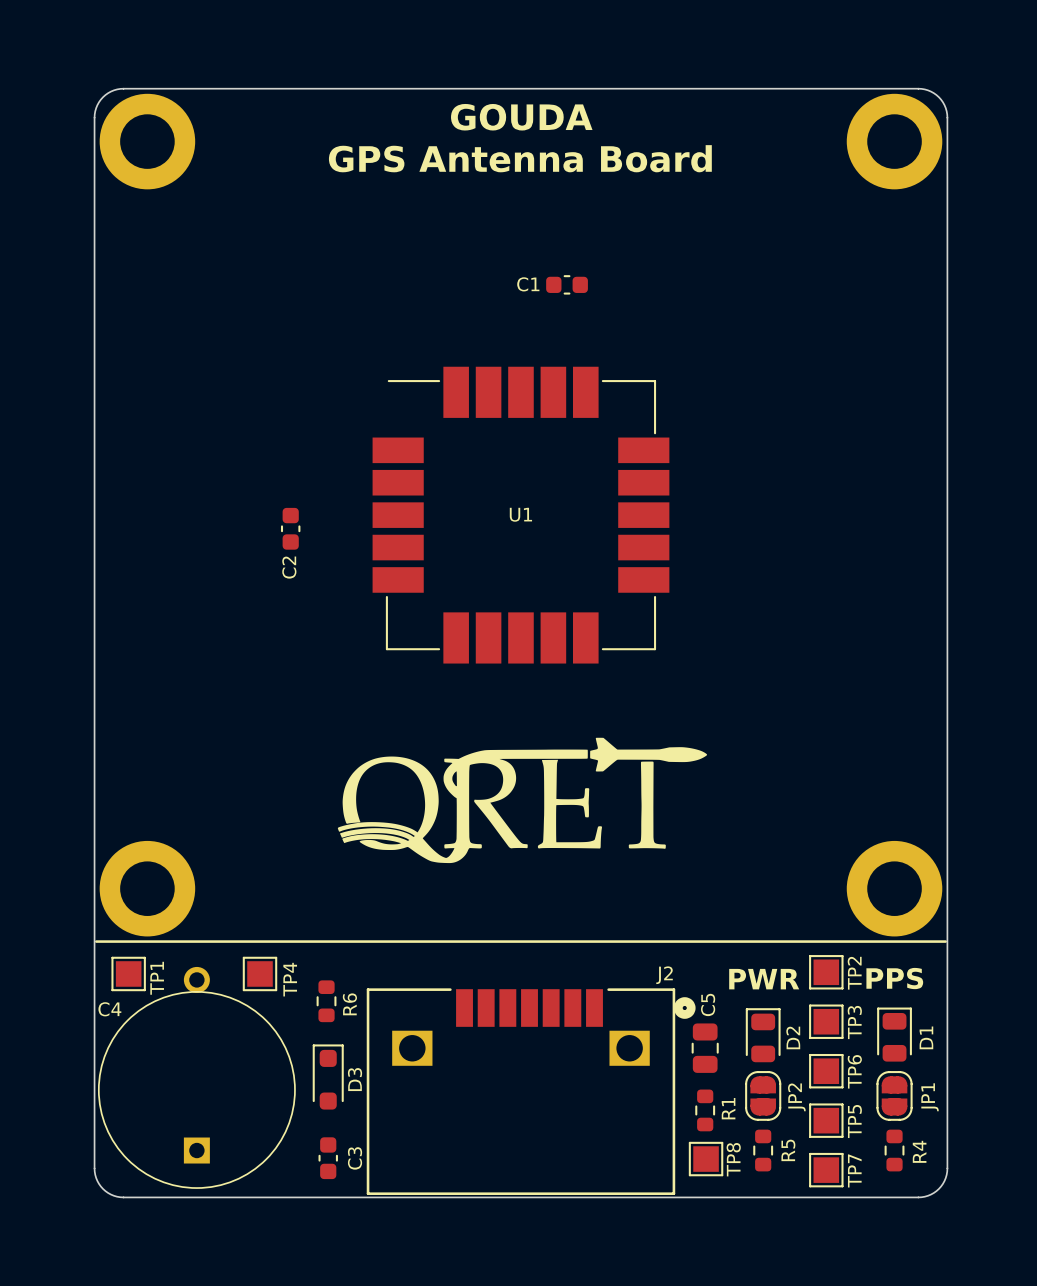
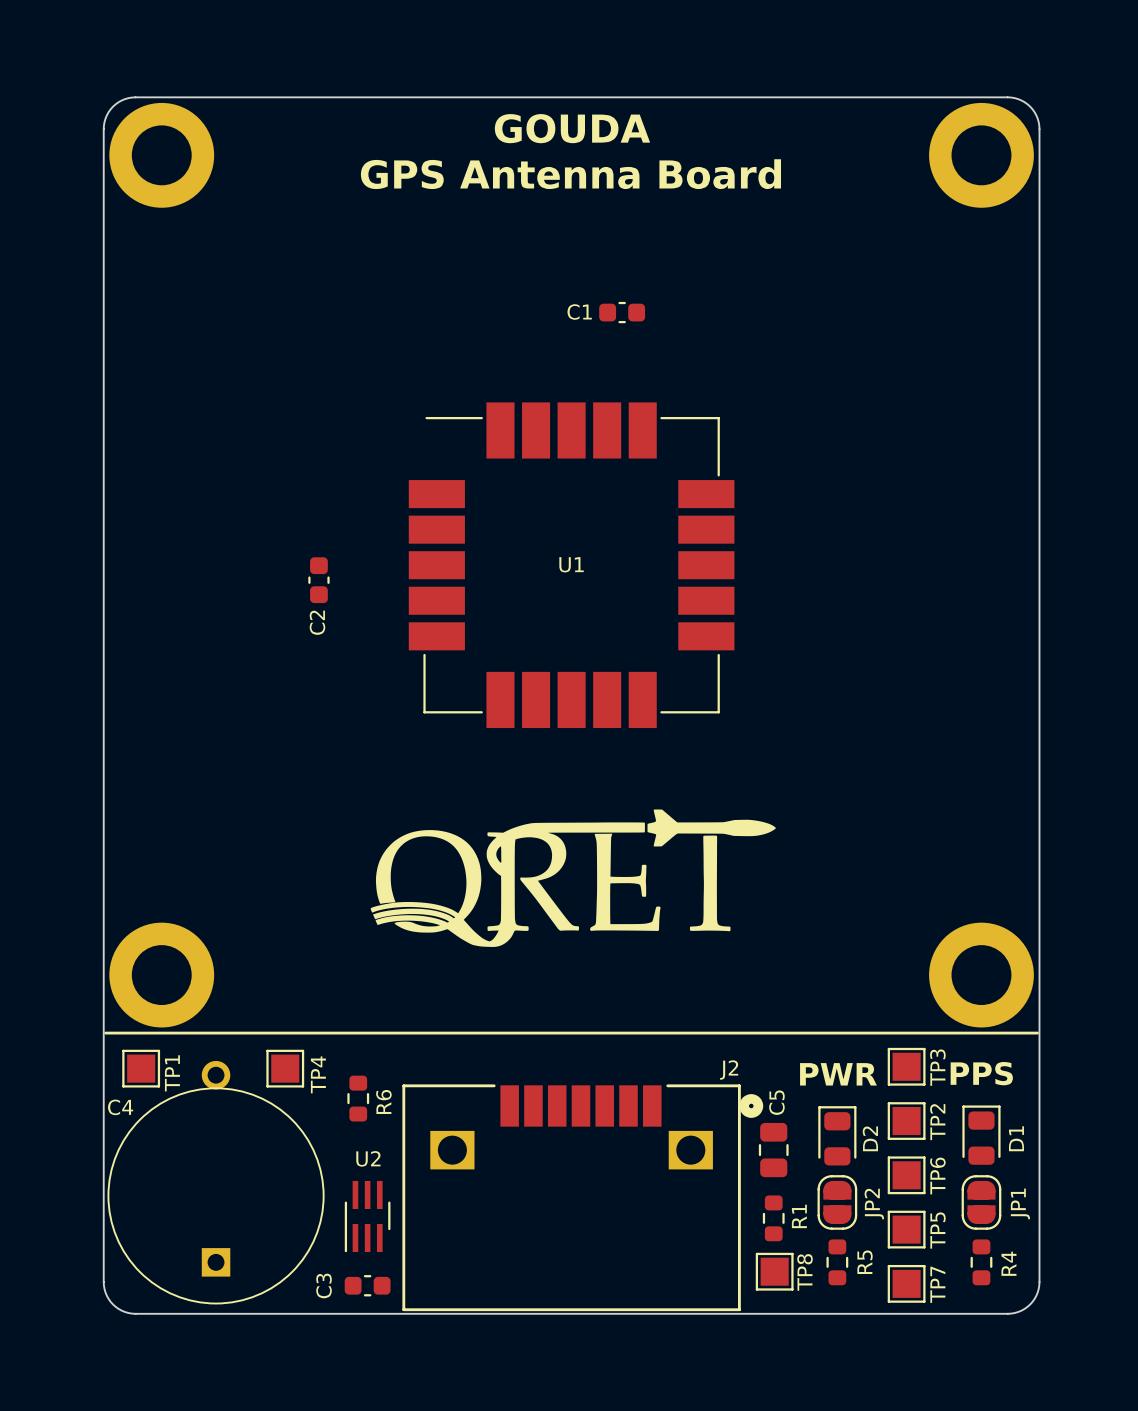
TP2 name: TP2 (854, 973) -> TP3 (937, 1067)
TP3 name: TP3 (854, 1022) -> TP2 (937, 1122)
D3: (328, 1077) -> none
U2: none -> (367, 1216)
C3 rotation: 0° (328, 1158) -> 90° clockwise (367, 1285)
C3 name position: C3 (355, 1158) -> C3 (324, 1285)

